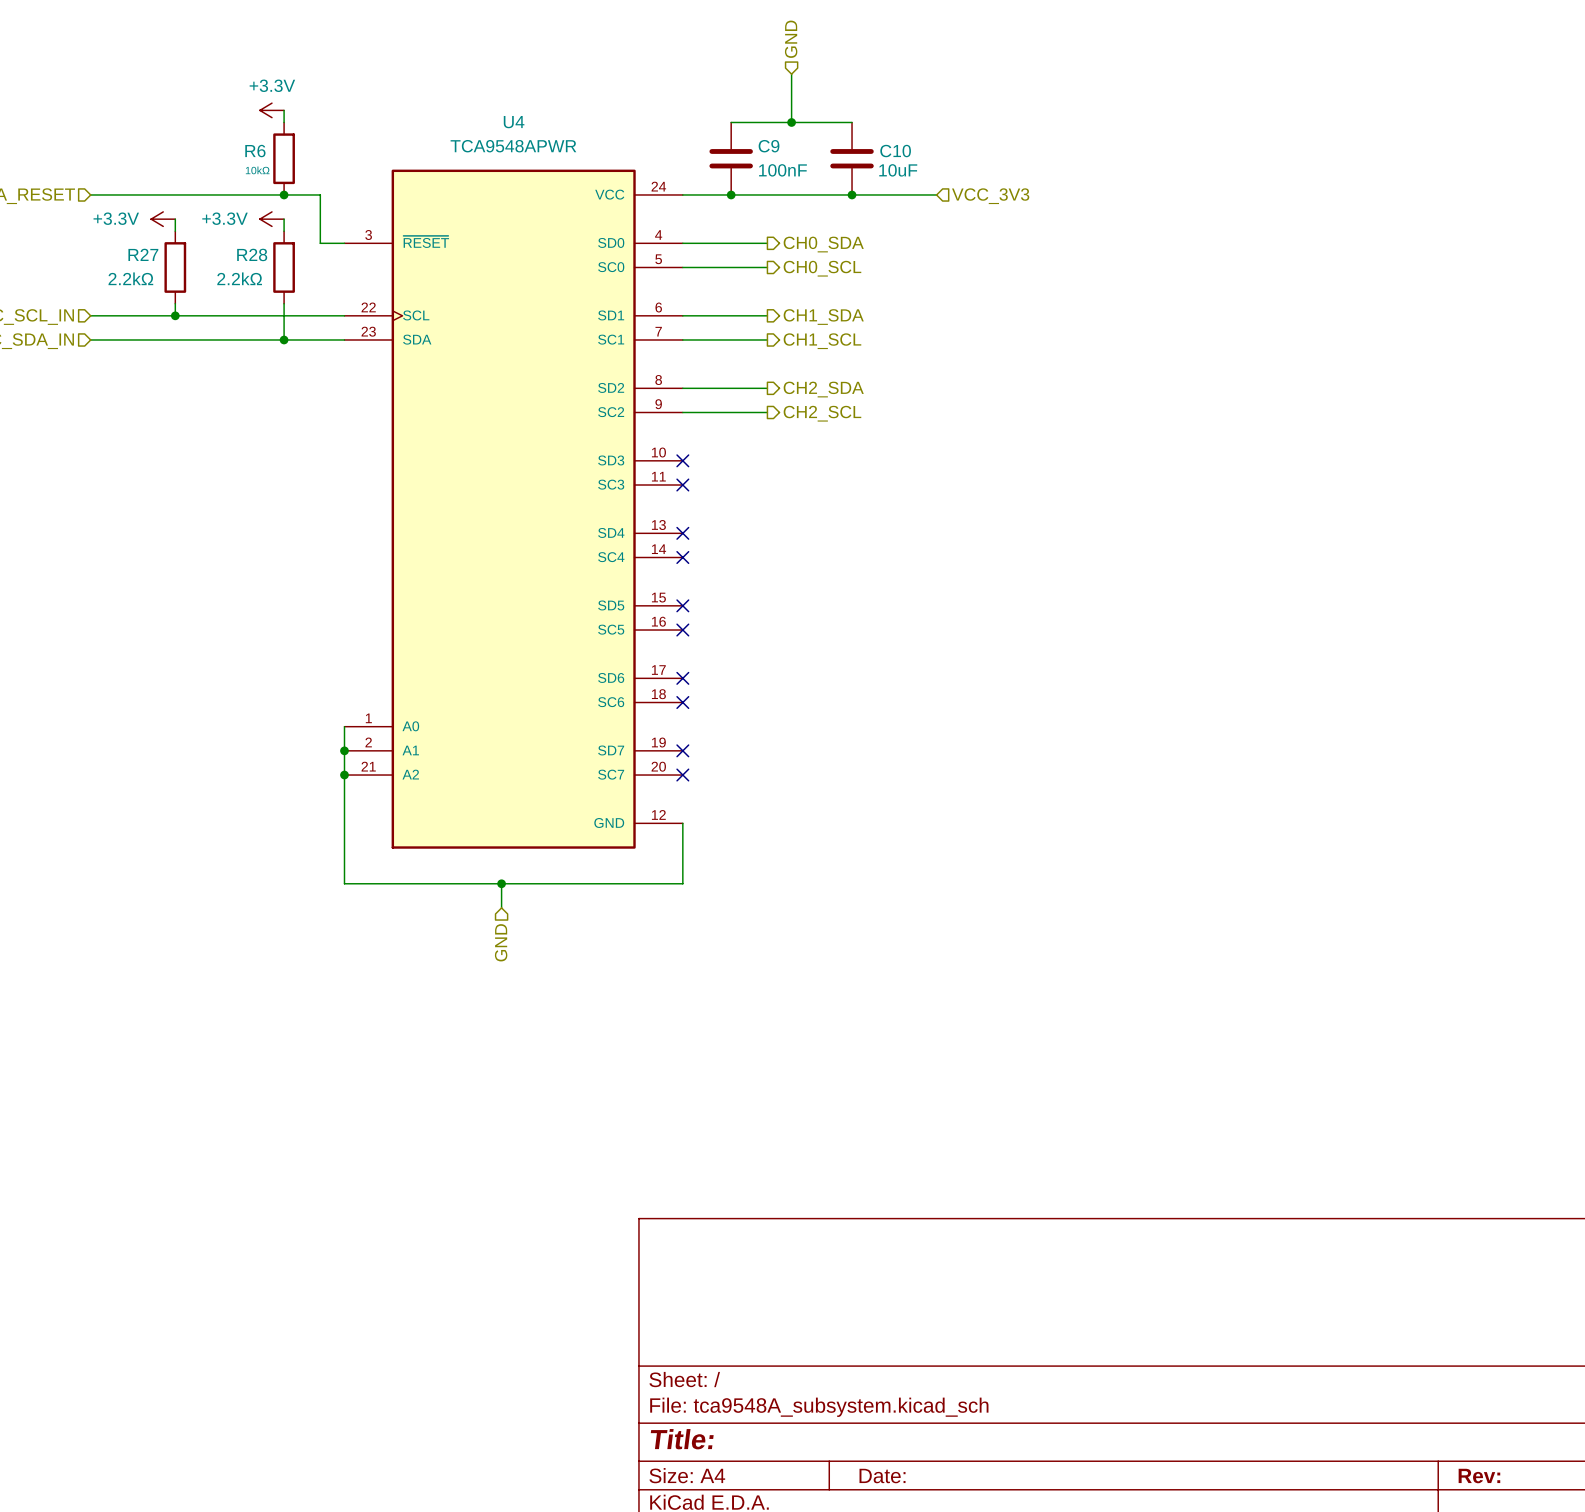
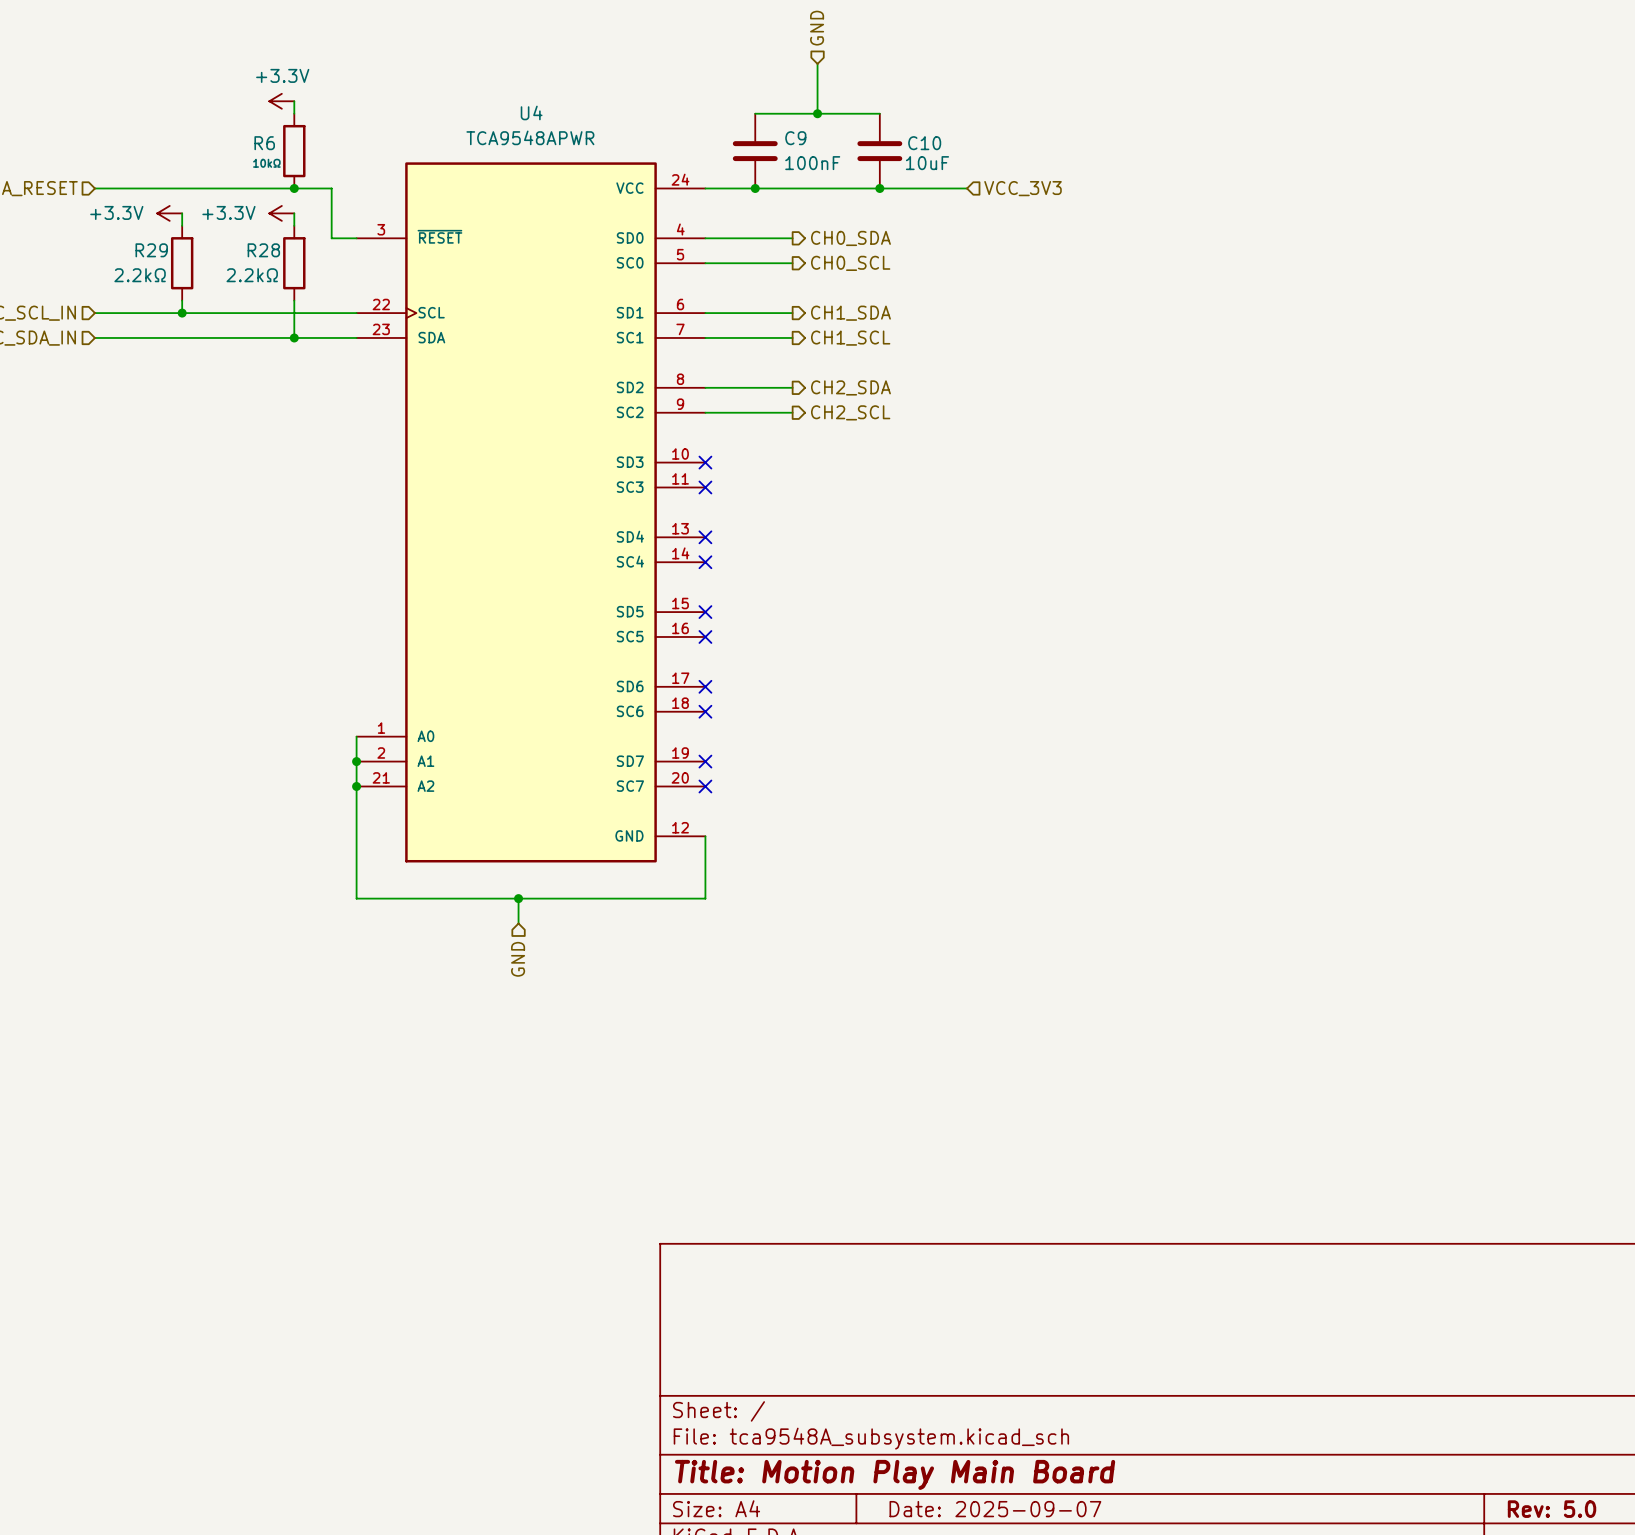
R27 name: R27 (143, 254) -> R29 (151, 250)
title block: Title: (682, 1439) -> Title: Motion Play Main Board (895, 1474)
title block: Date: (882, 1476) -> Date: 2025-09-07 (995, 1509)
title block: Rev: (1479, 1476) -> Rev: 5.0 (1552, 1509)

